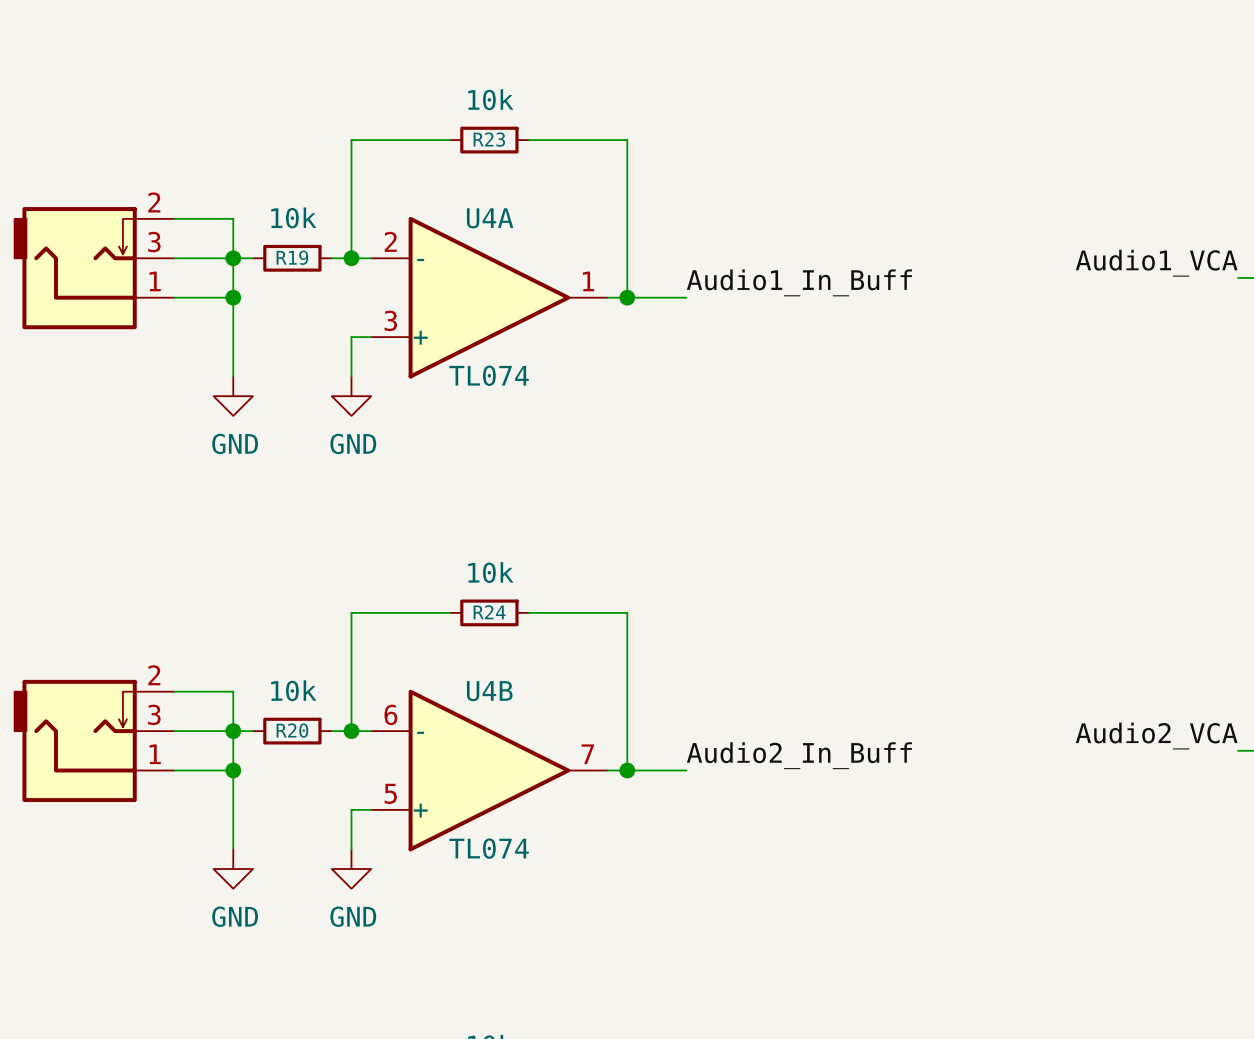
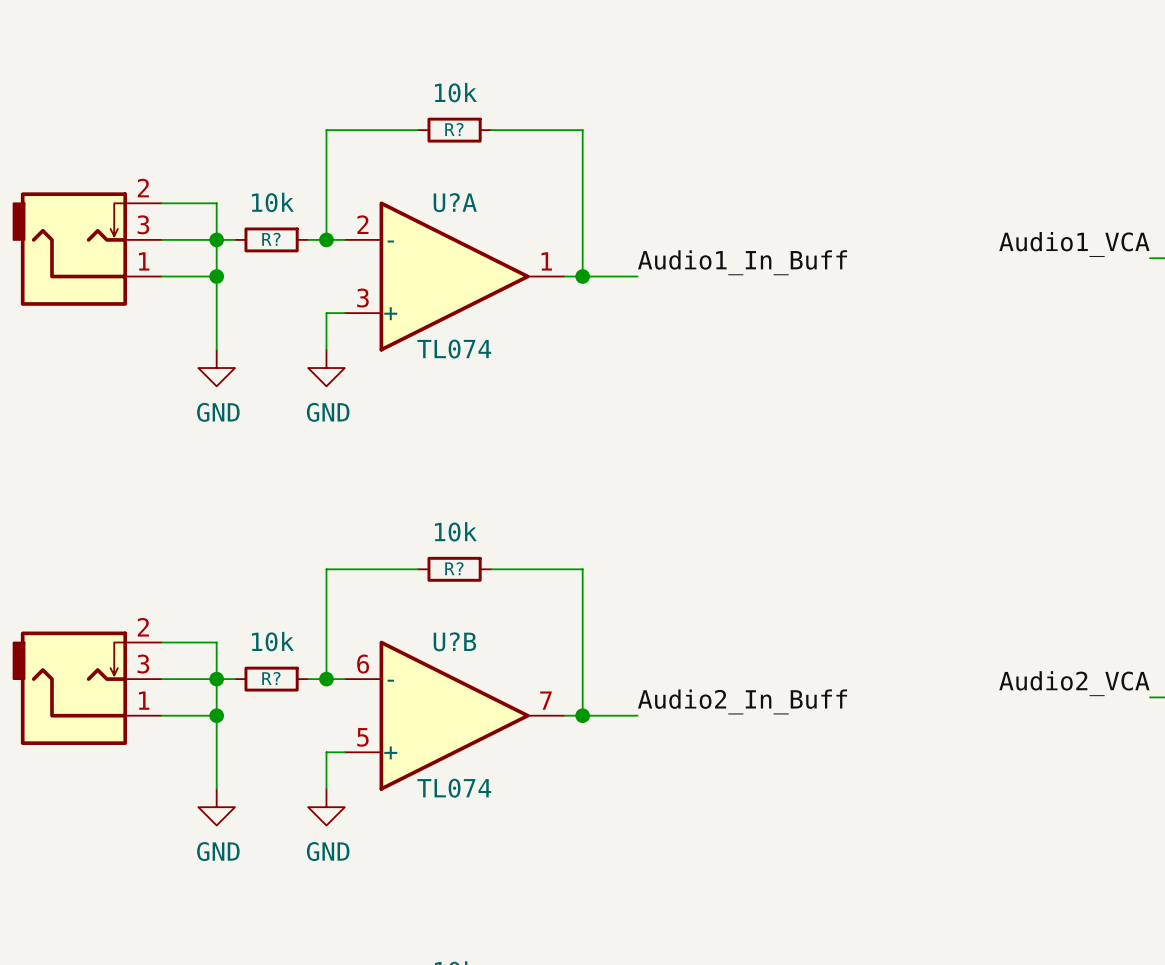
R23 name: R23 (489, 139) -> R? (454, 129)
U4A name: U4A (490, 218) -> U?A (455, 202)
R19 name: R19 (292, 257) -> R? (271, 239)
R24 name: R24 (489, 612) -> R? (454, 568)
U4B name: U4B (489, 691) -> U?B (454, 641)
R20 name: R20 (292, 730) -> R? (271, 678)

